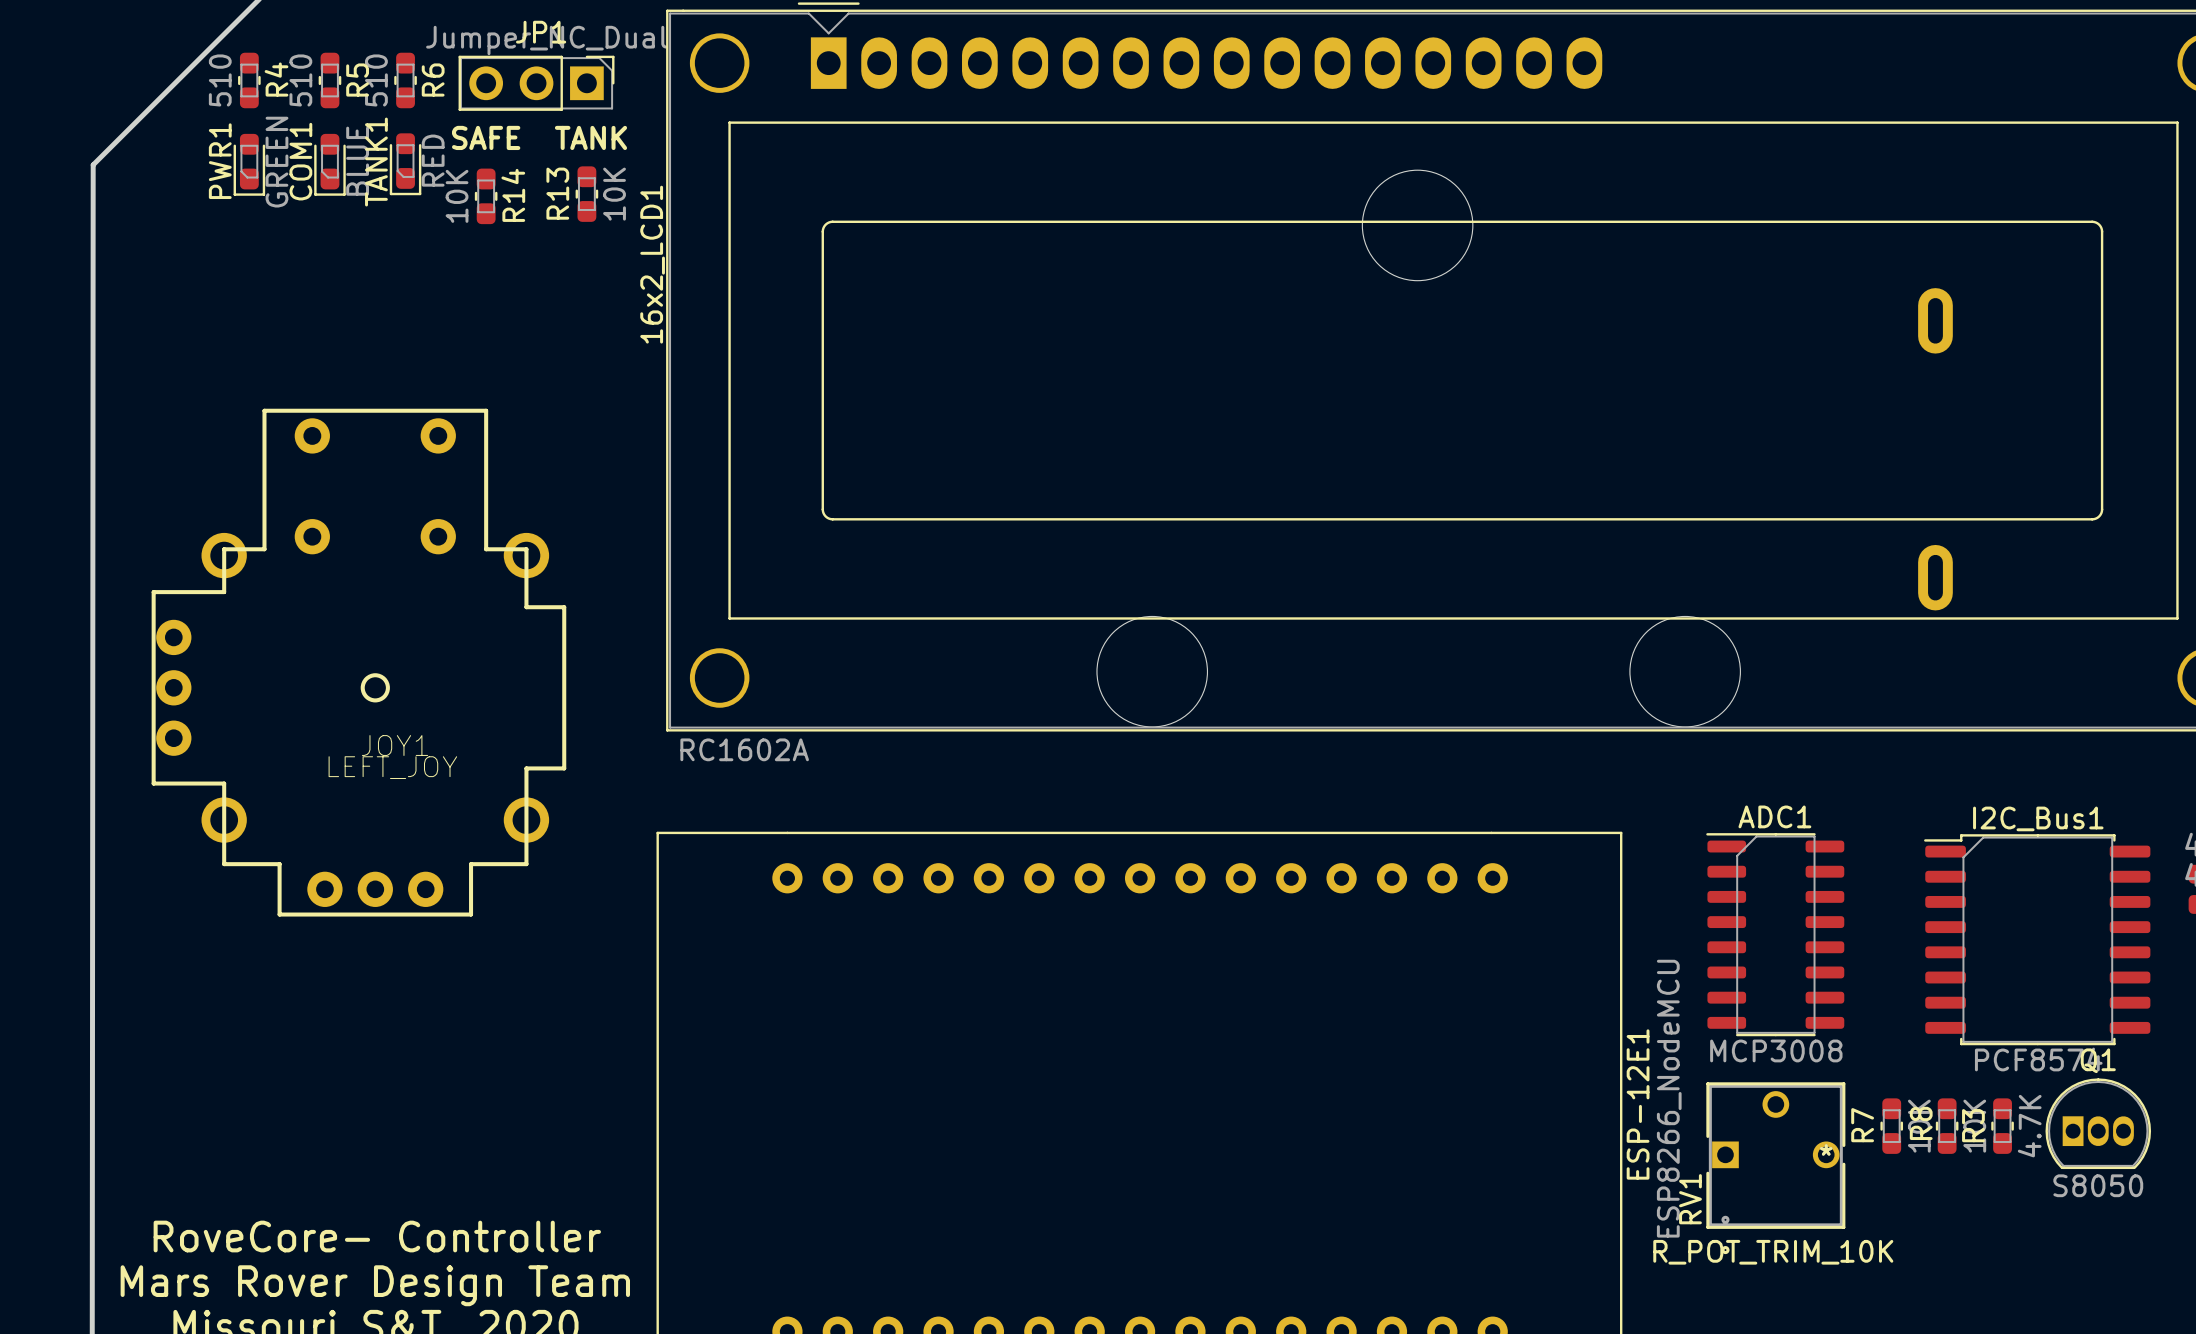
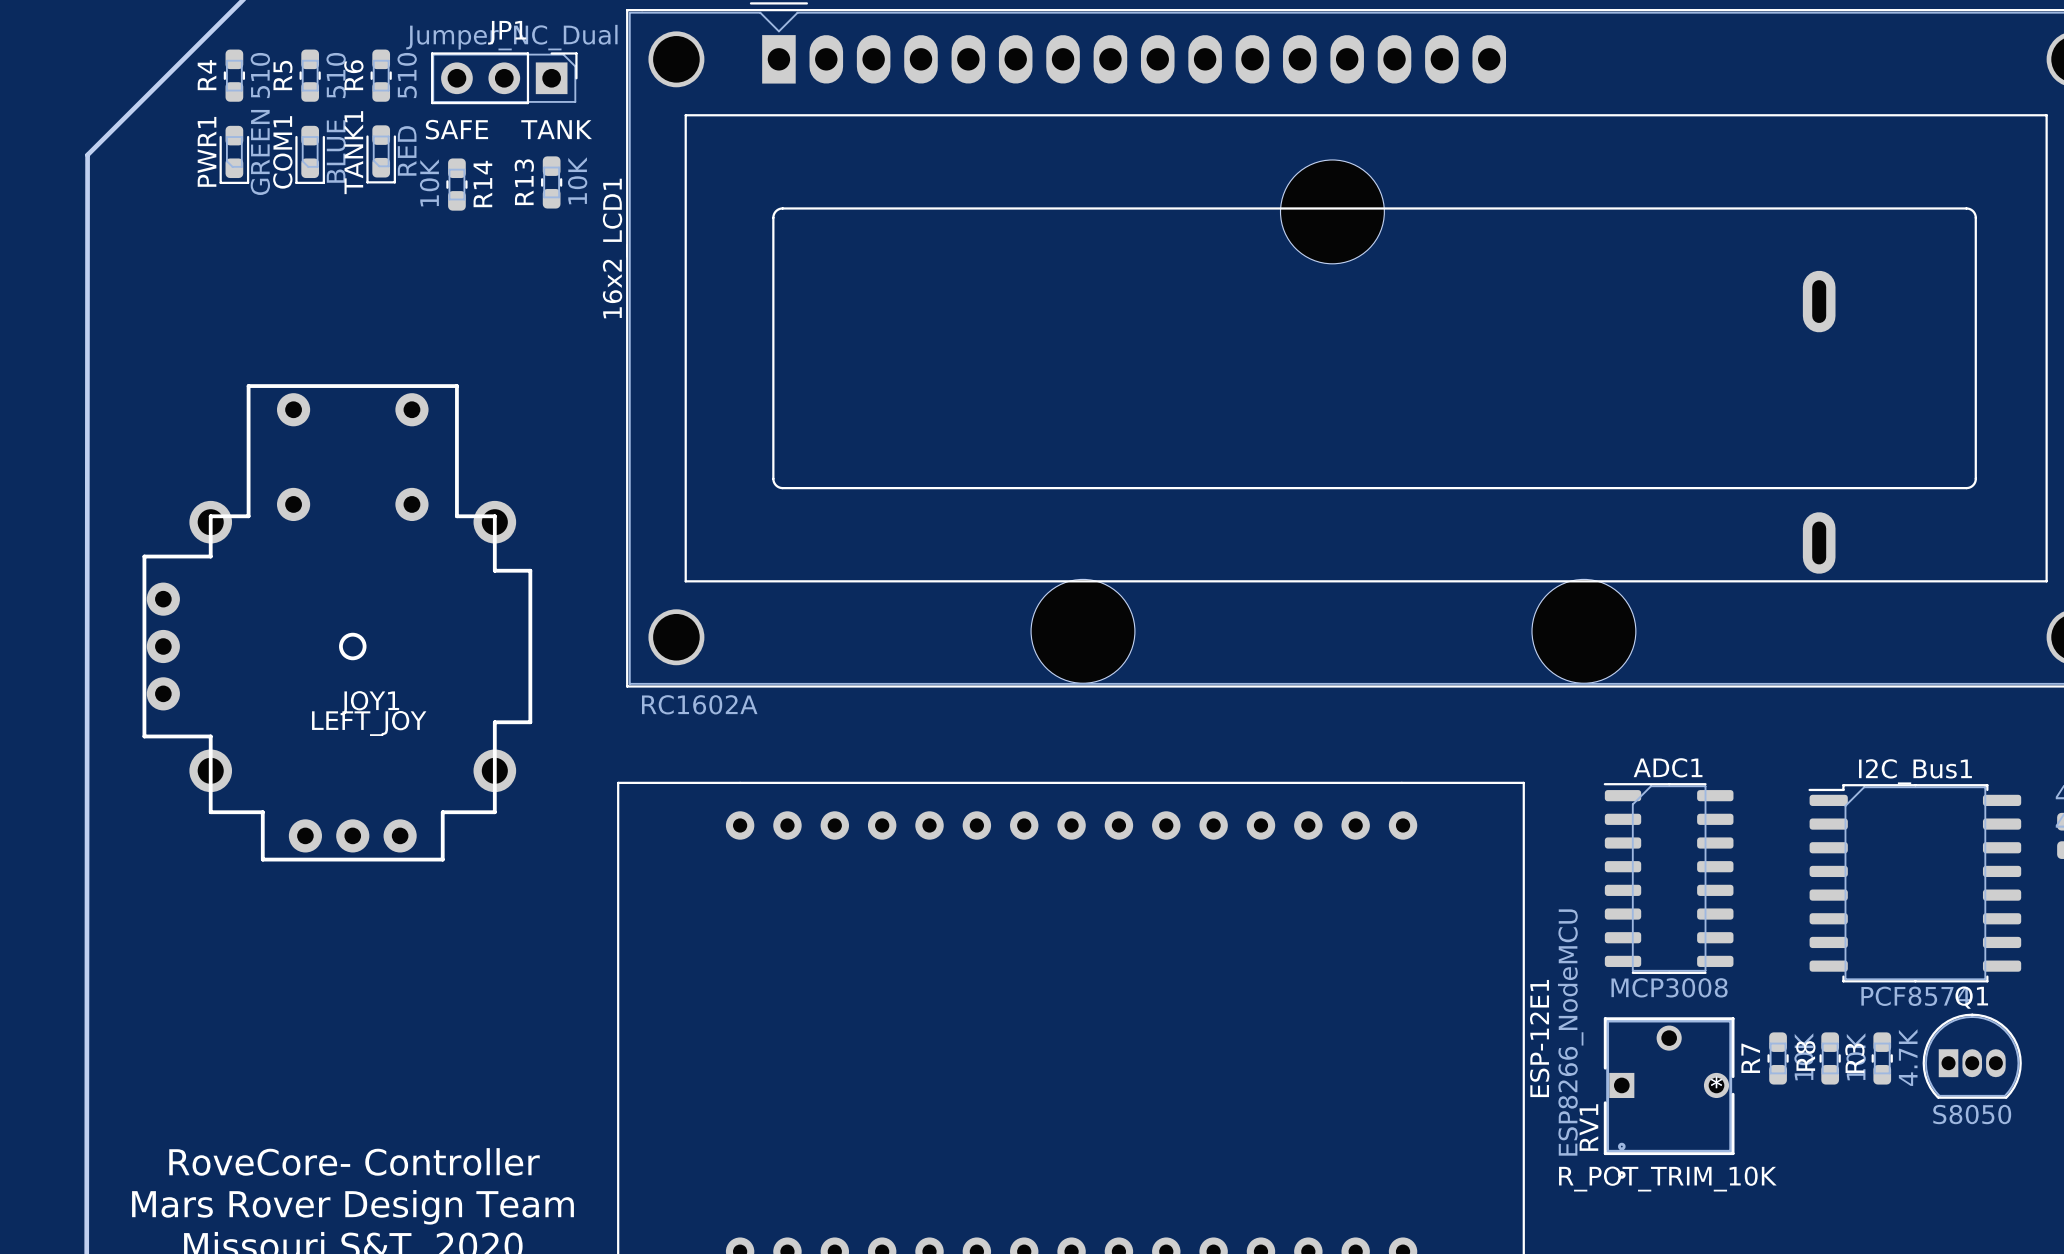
R4 name position: R4 (276, 79) -> R4 (207, 75)
R4 value position: 510 (220, 80) -> 510 (260, 75)
R5 value position: 510 (300, 80) -> 510 (336, 75)
R5 name position: R5 (357, 80) -> R5 (282, 75)
R6 value position: 510 (376, 80) -> 510 (407, 75)
R6 name position: R6 (433, 80) -> R6 (353, 75)

